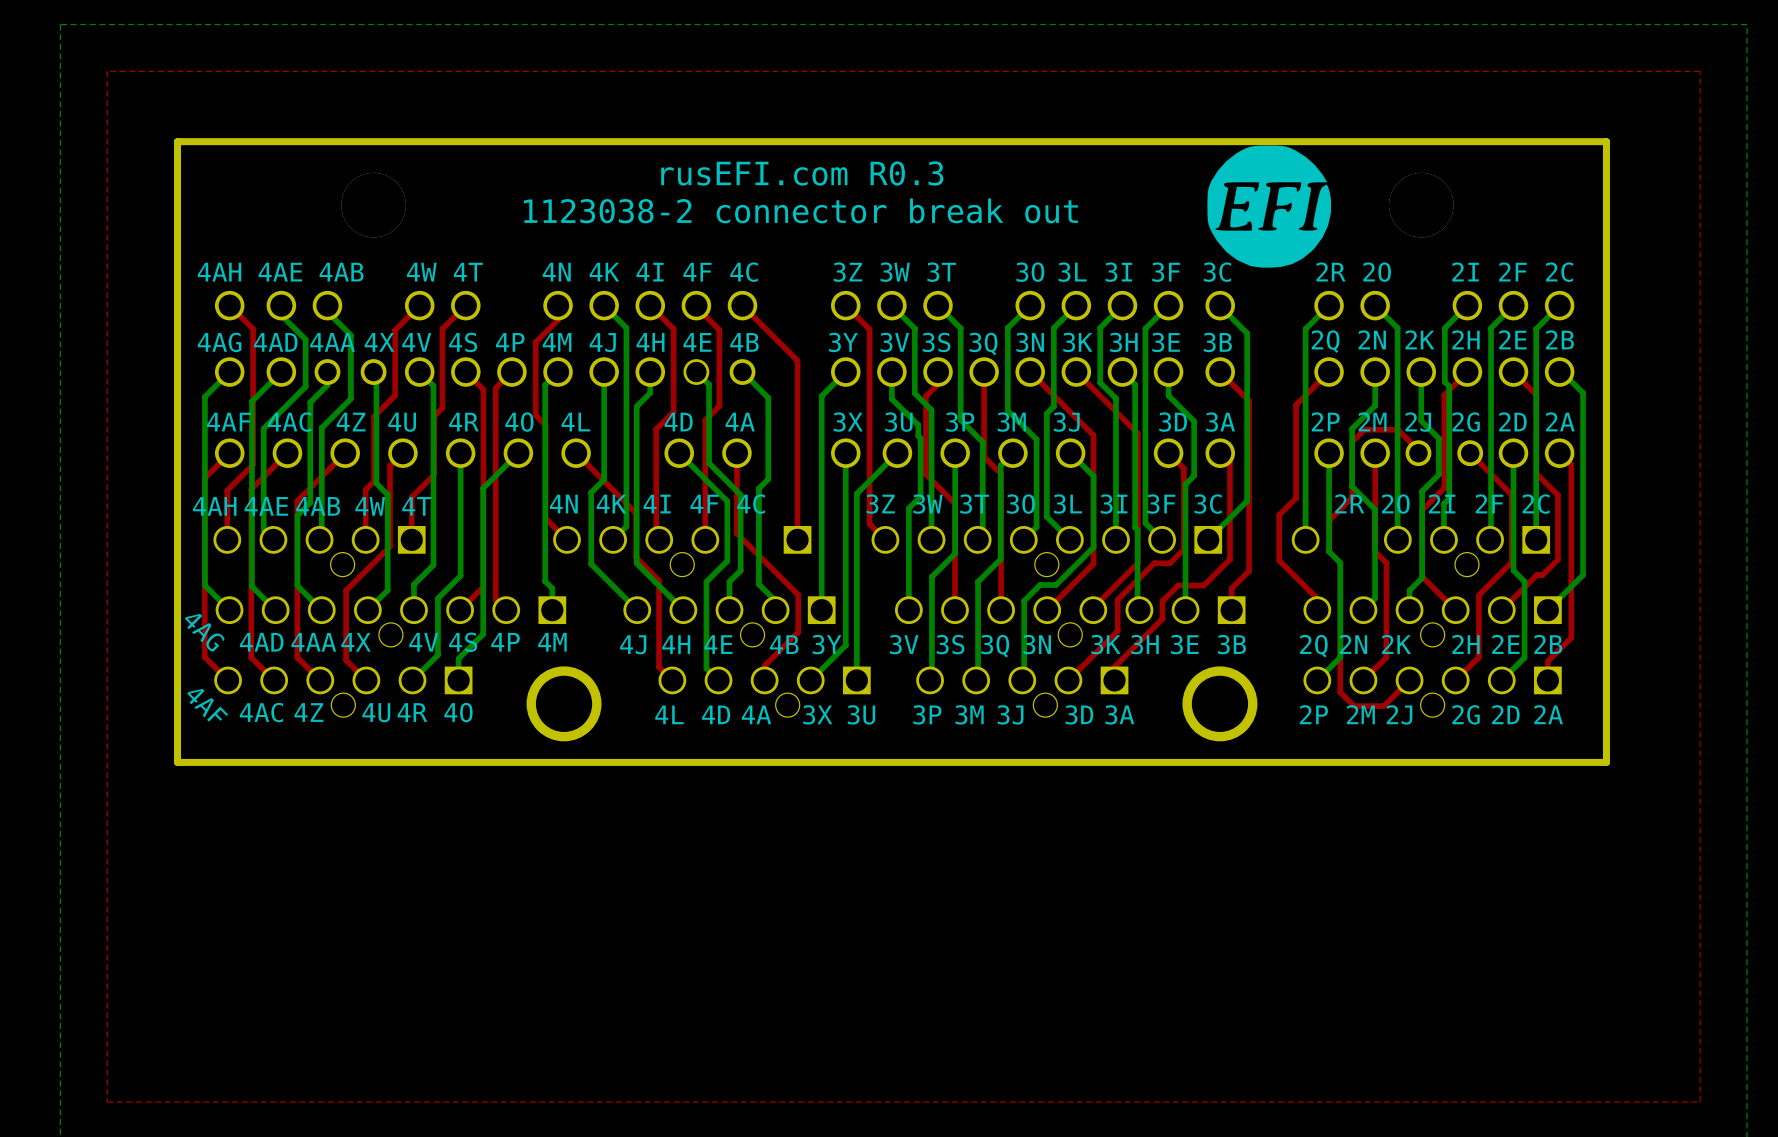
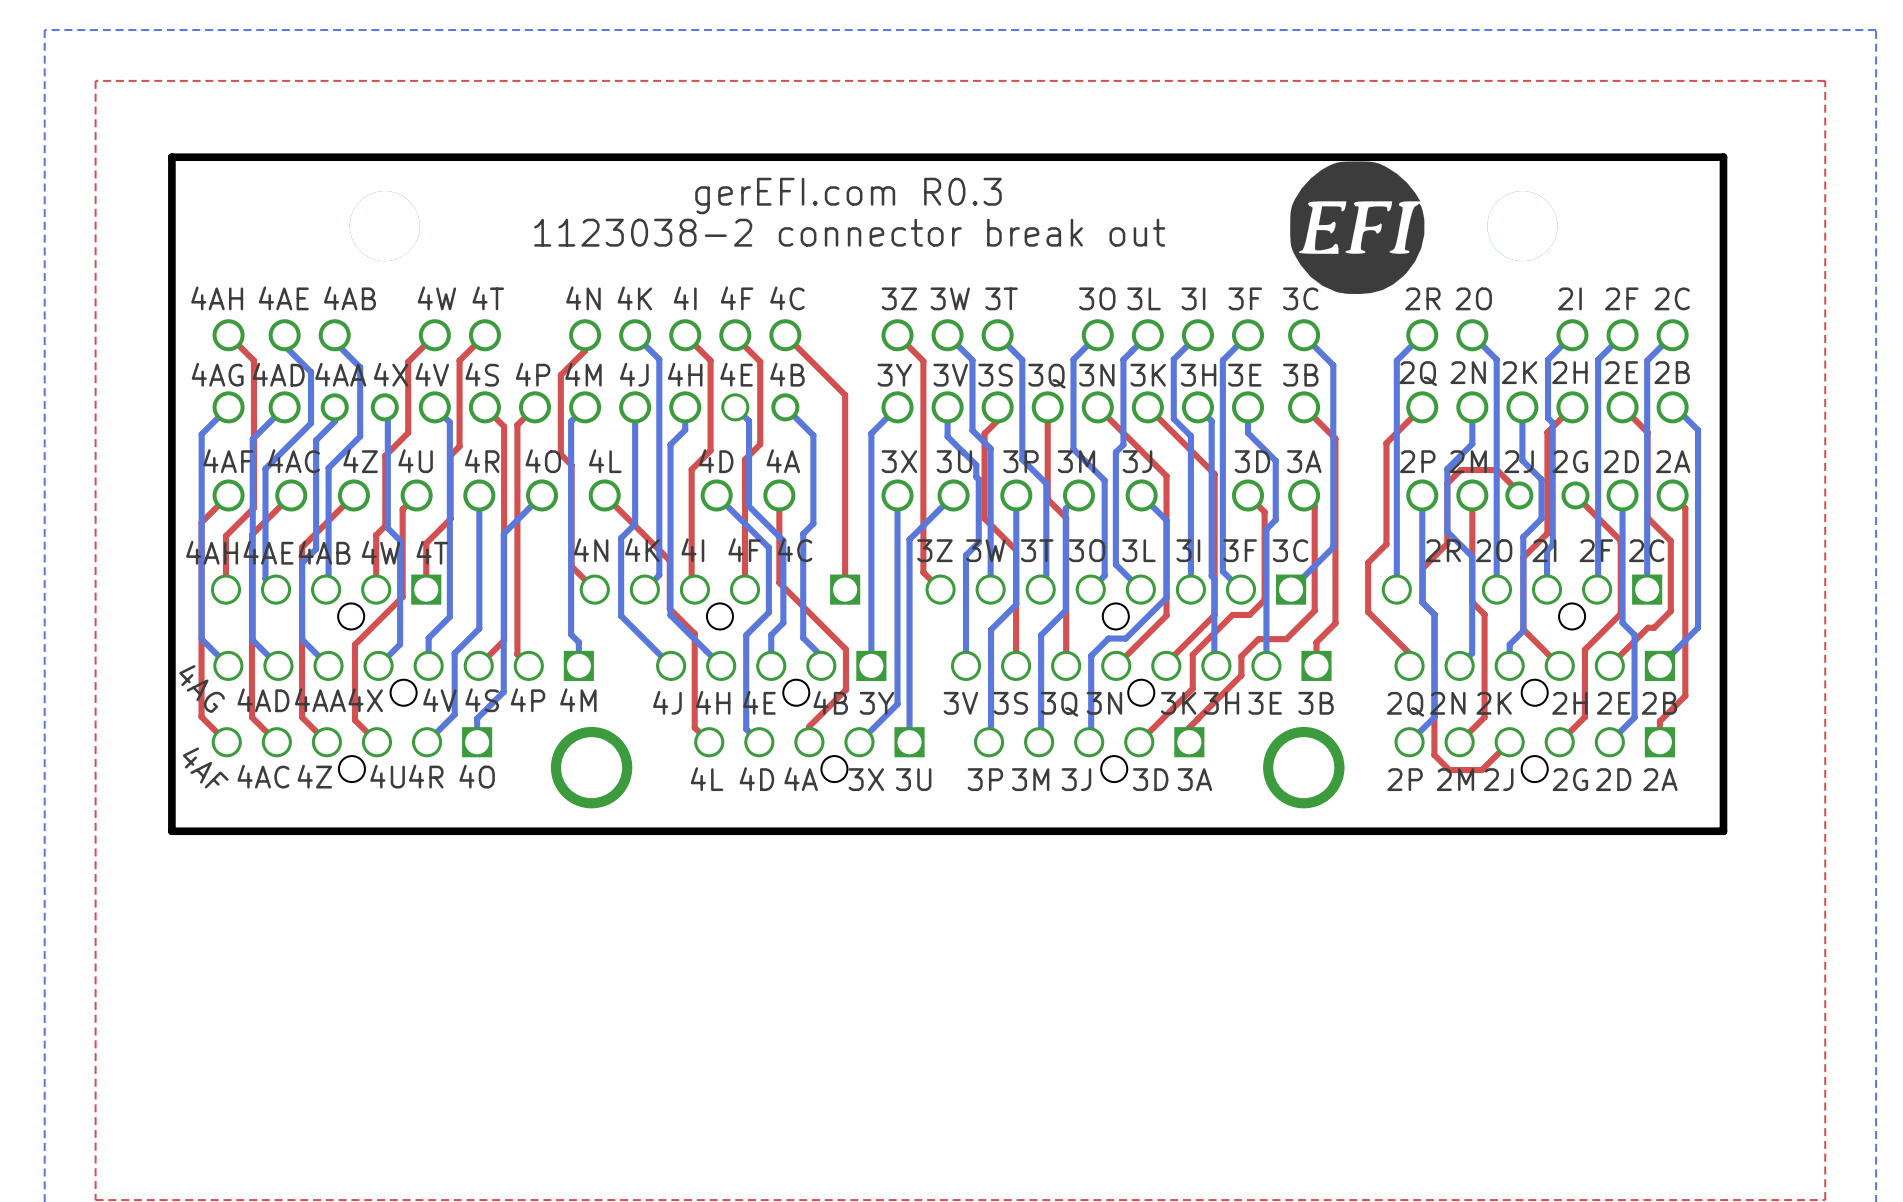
text: rusEFI.com R0.3 (802, 173) -> gerEFI.com R0.3 (848, 195)

